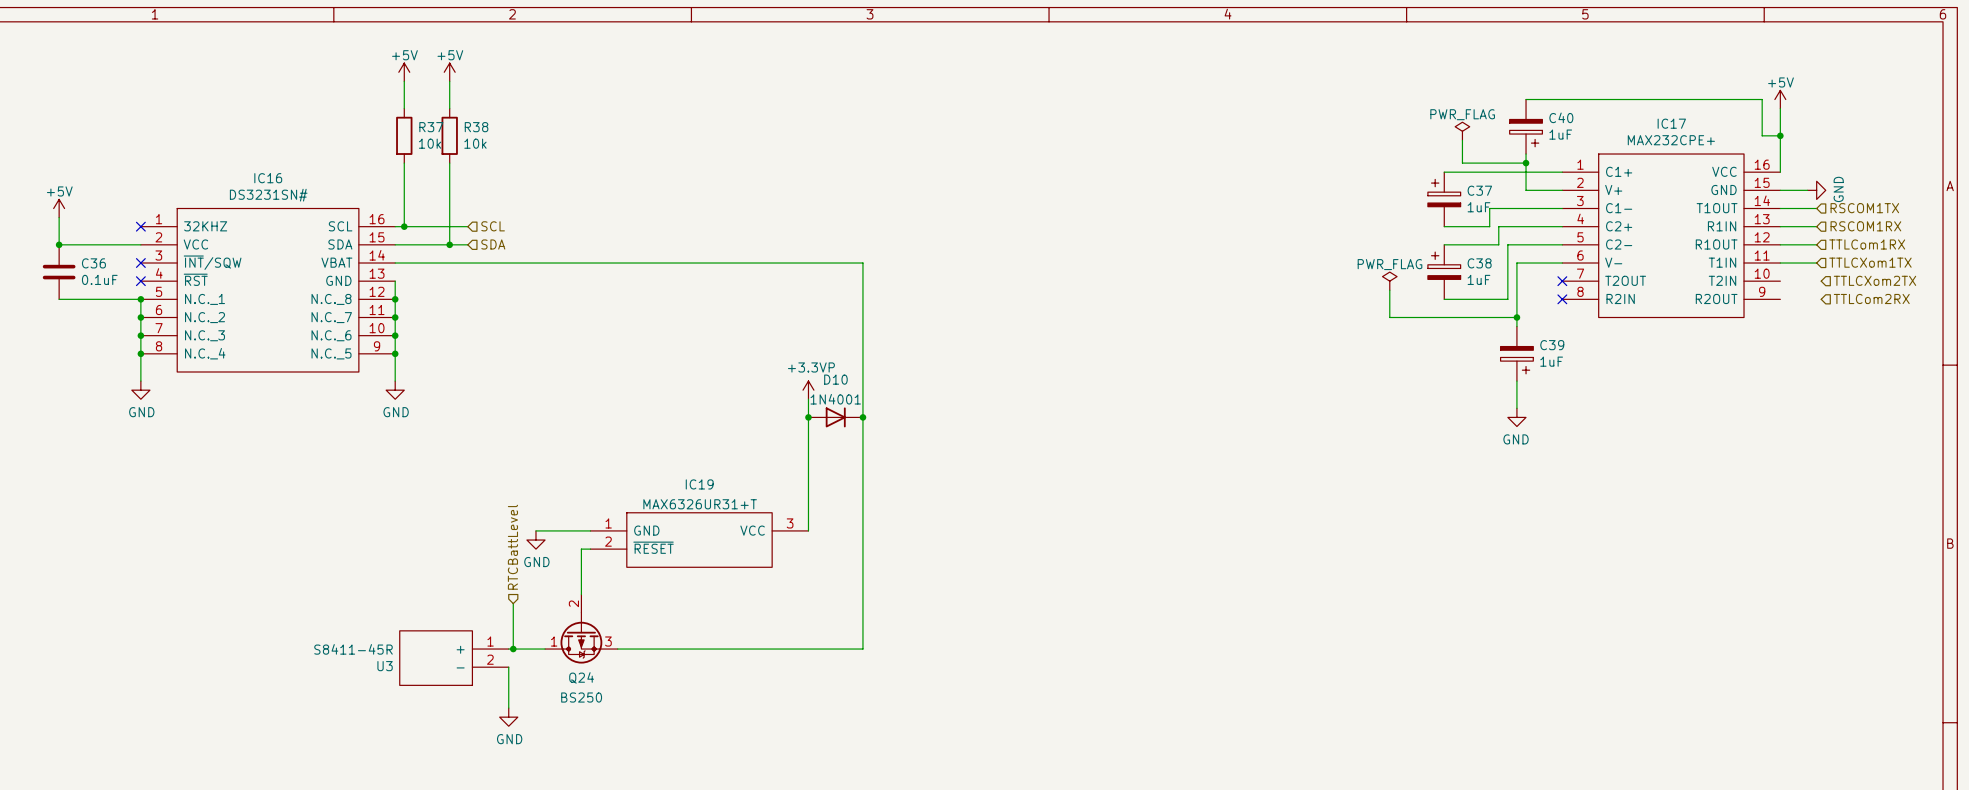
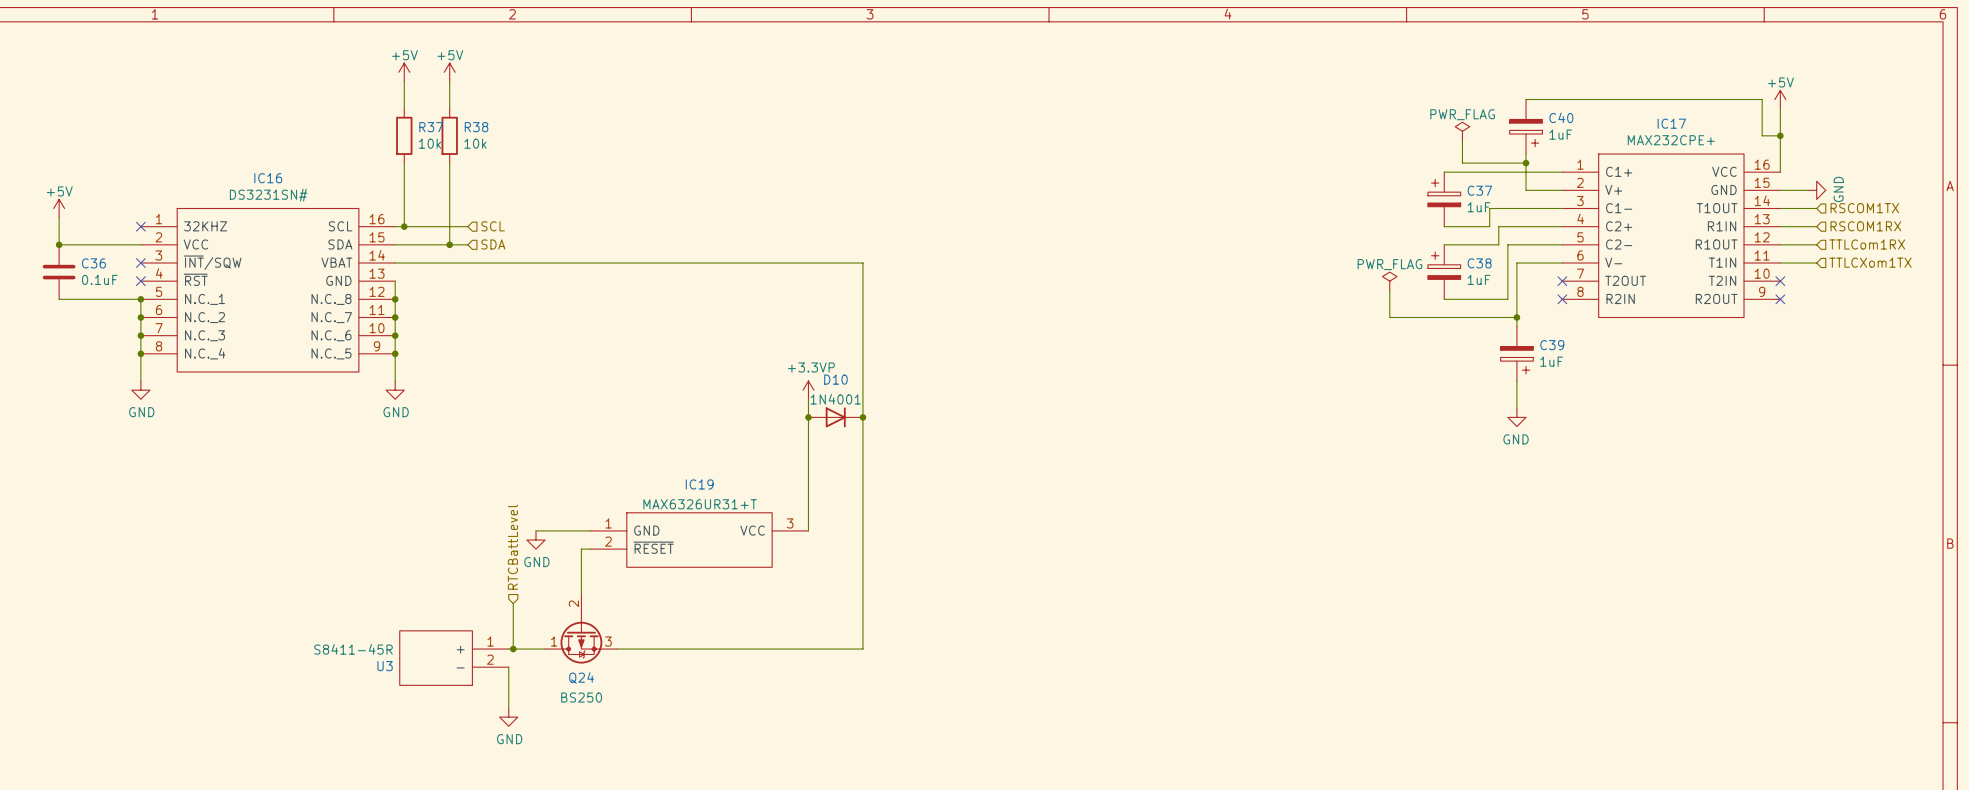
hierarchical label: TTLCXom2TX (1874, 280) -> none
no-connect mark: none -> (1780, 281)
hierarchical label: TTLCom2RX (1871, 298) -> none
no-connect mark: none -> (1780, 299)

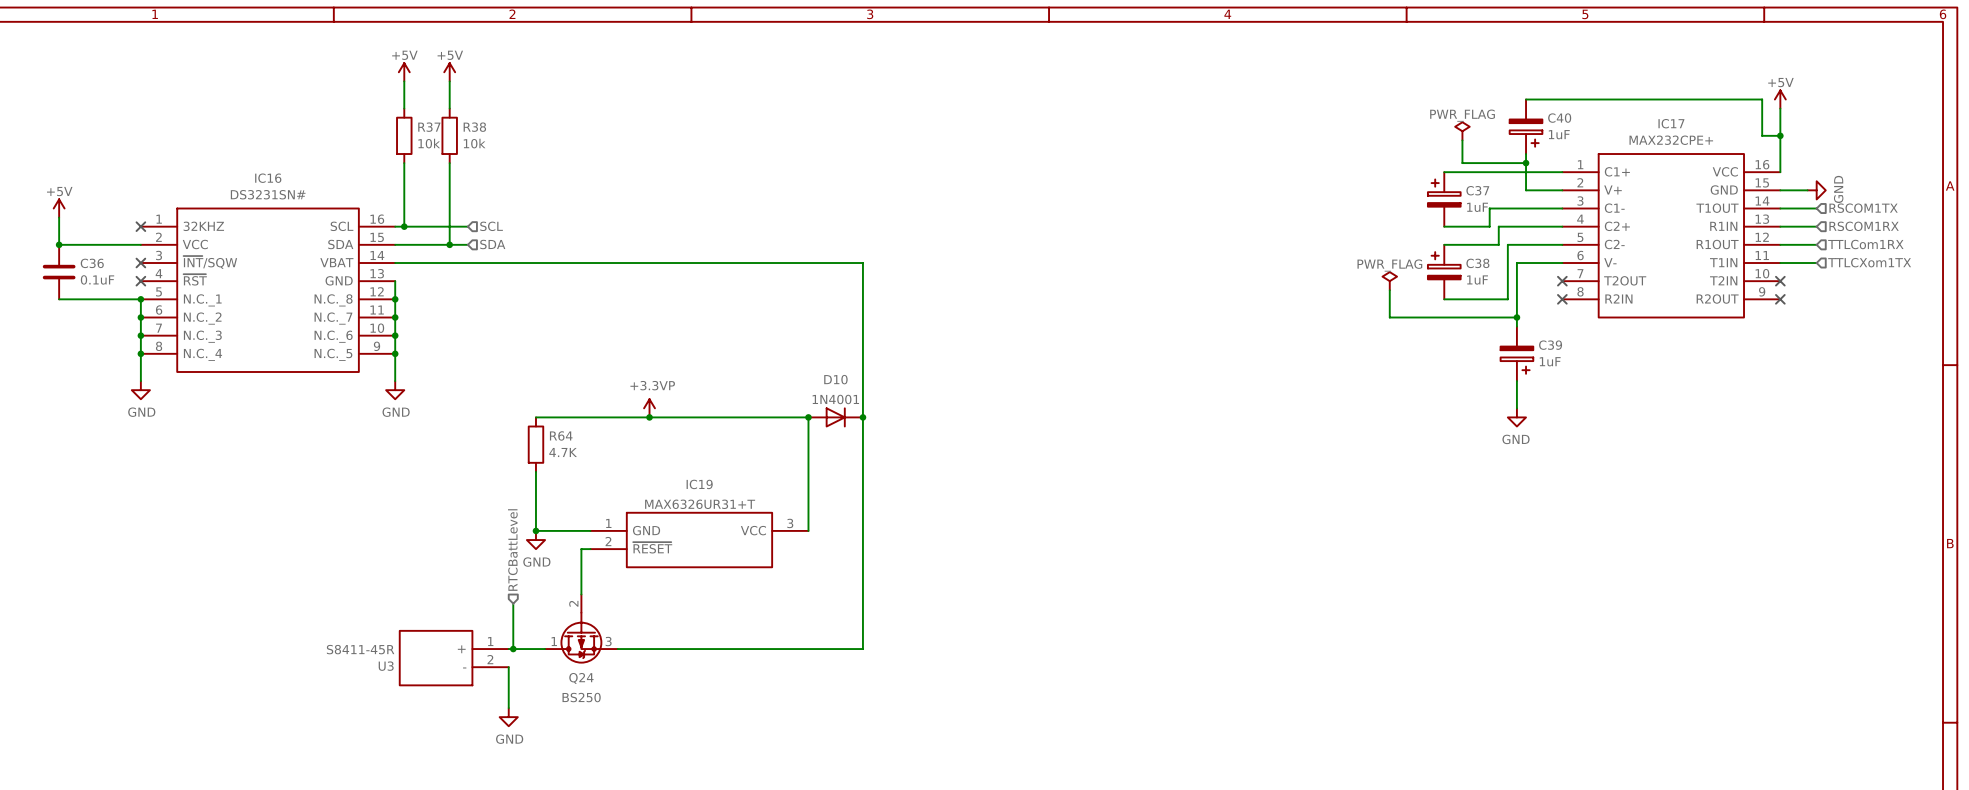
power symbol position: +3.3VP (808, 390) -> +3.3VP (649, 408)
wire: (808, 399) (808, 417) -> (535, 417) (808, 417)
junction: none -> (649, 417)
R64: none -> 4.7K (535, 444)
wire: none -> (535, 471) (535, 530)
junction: none -> (535, 530)

